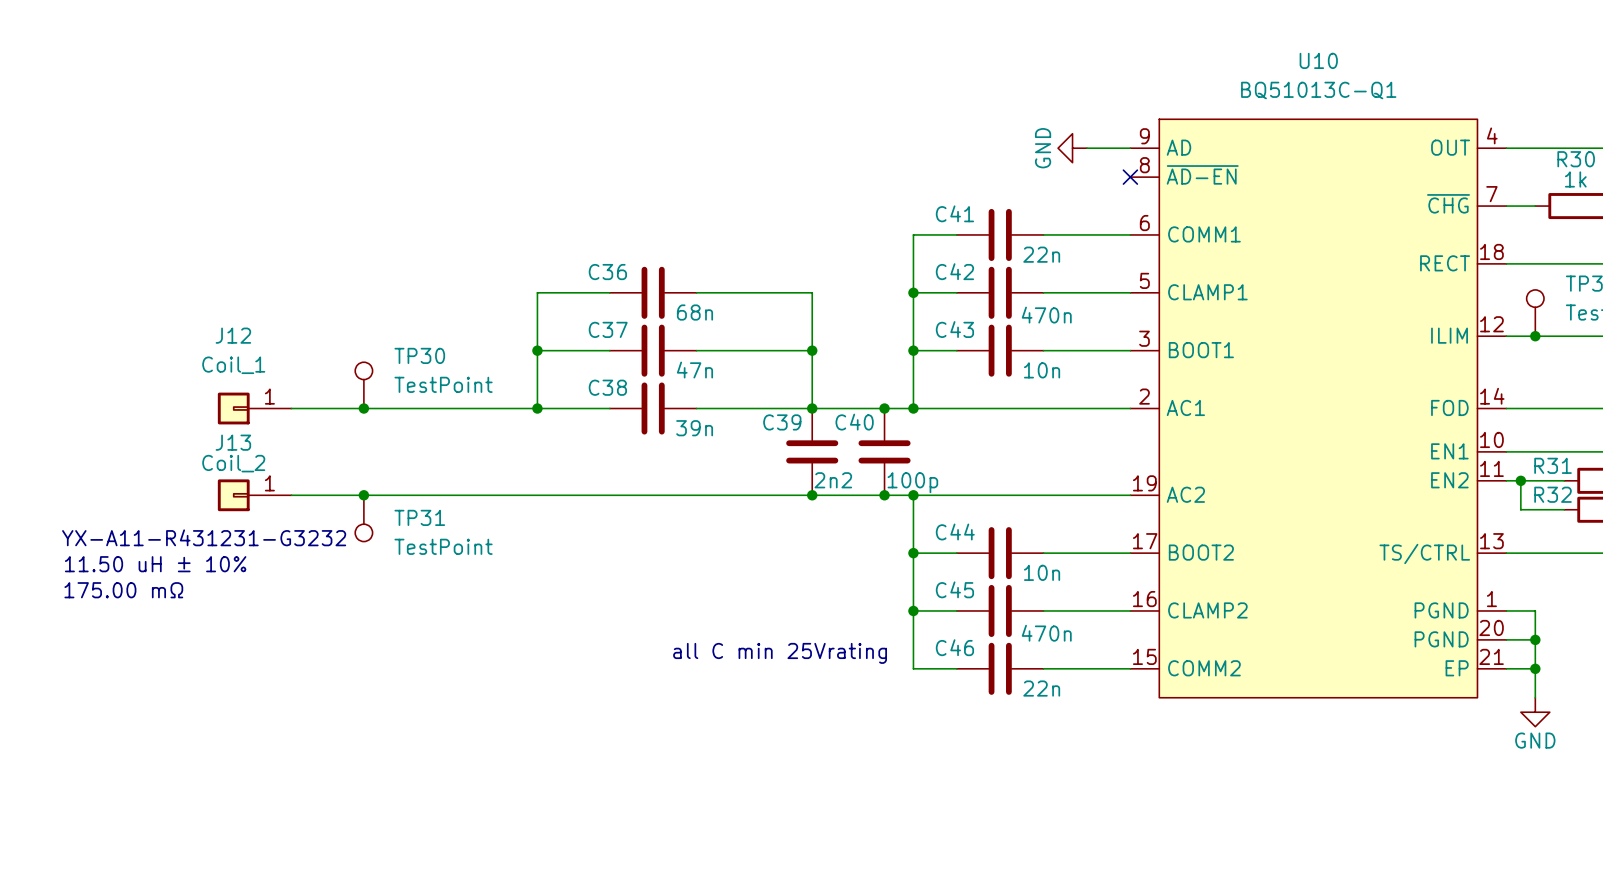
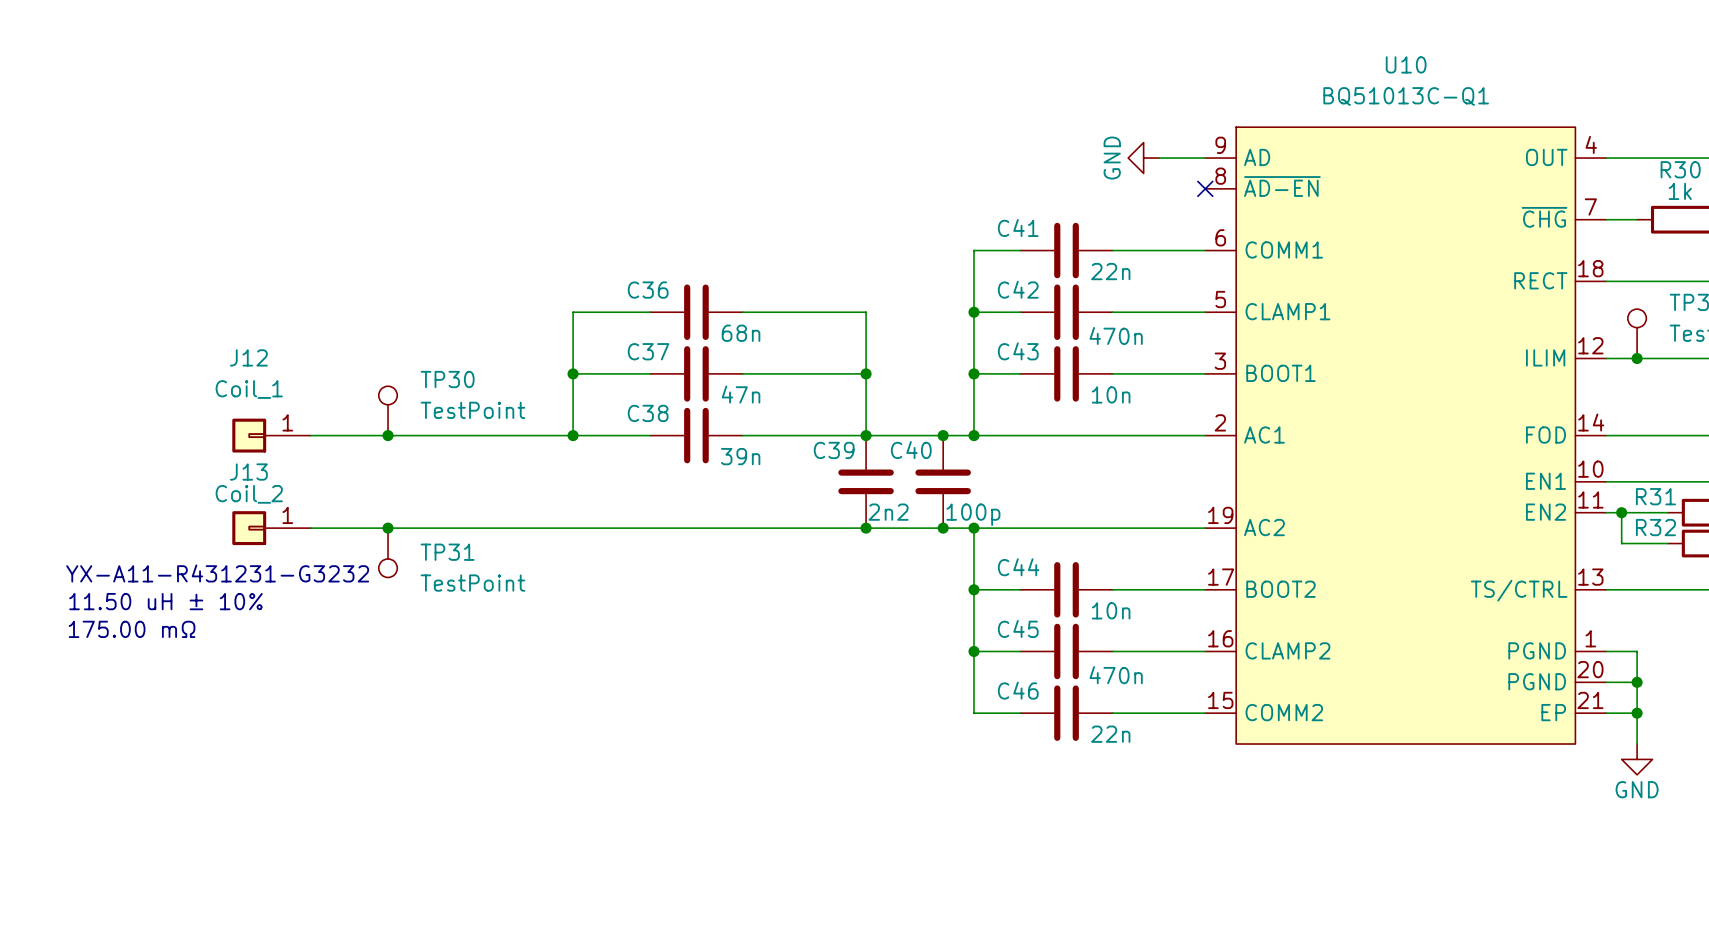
text: all C min 25Vrating (780, 653) -> none

